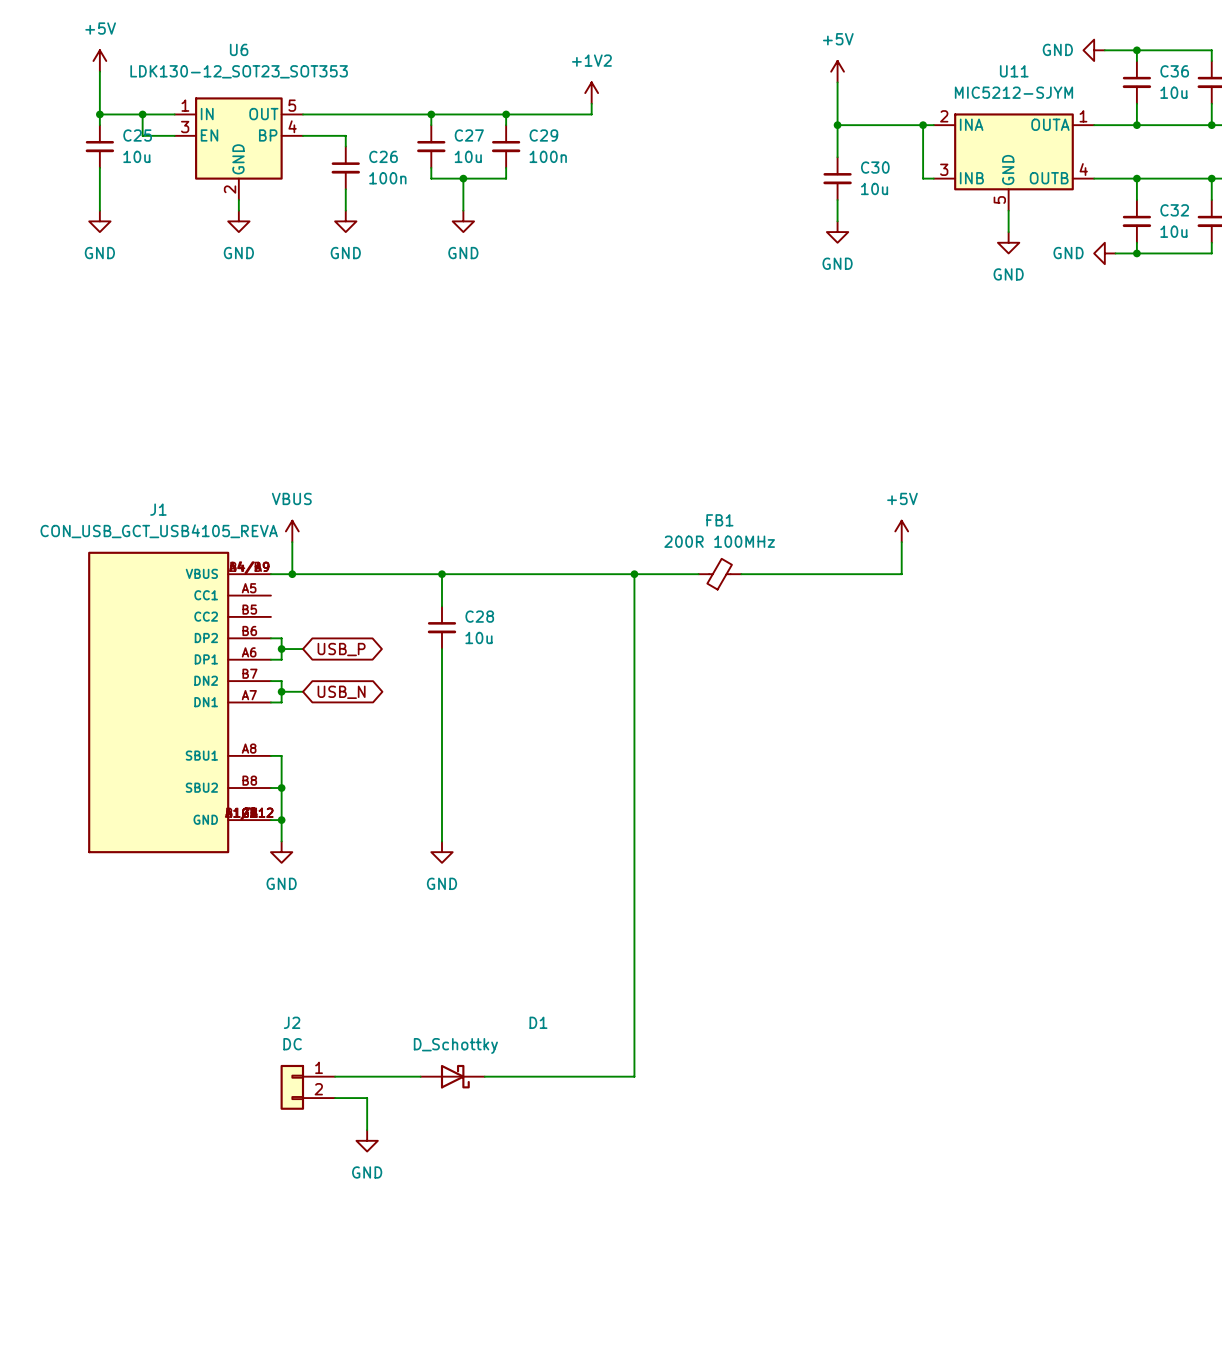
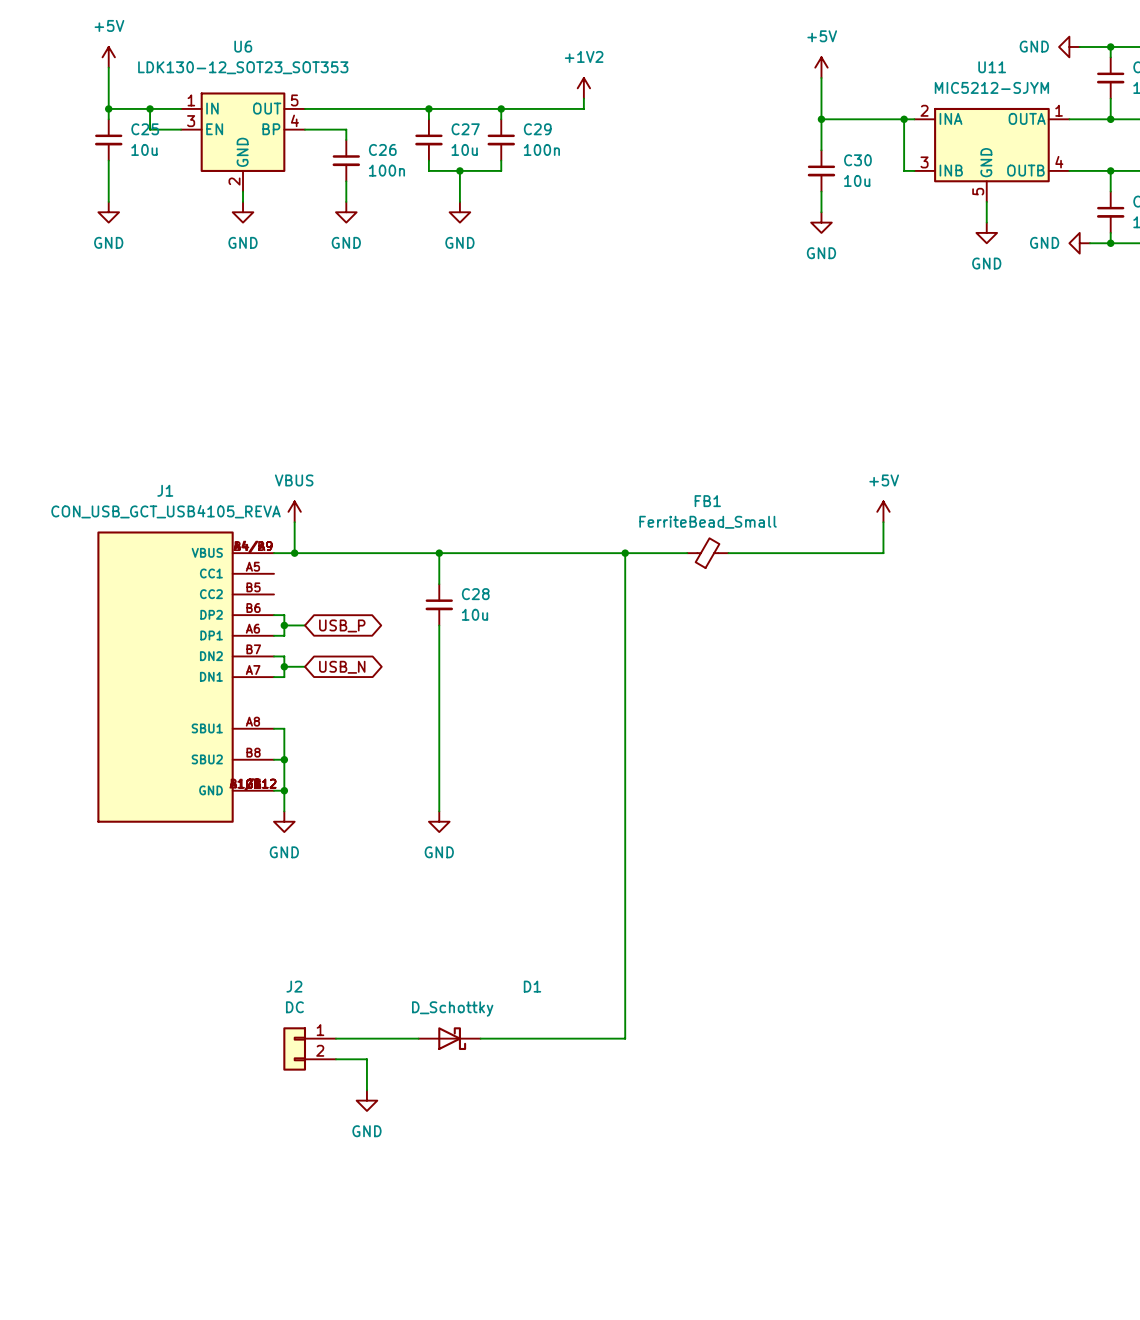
FB1 value: 200R 100MHz (719, 541) -> FerriteBead_Small (708, 522)

